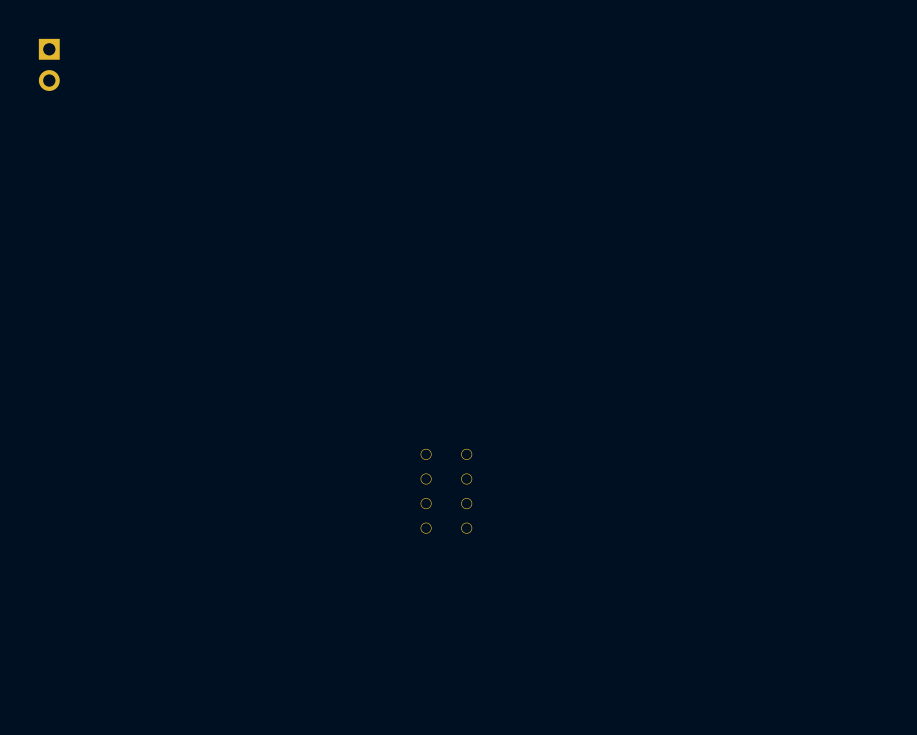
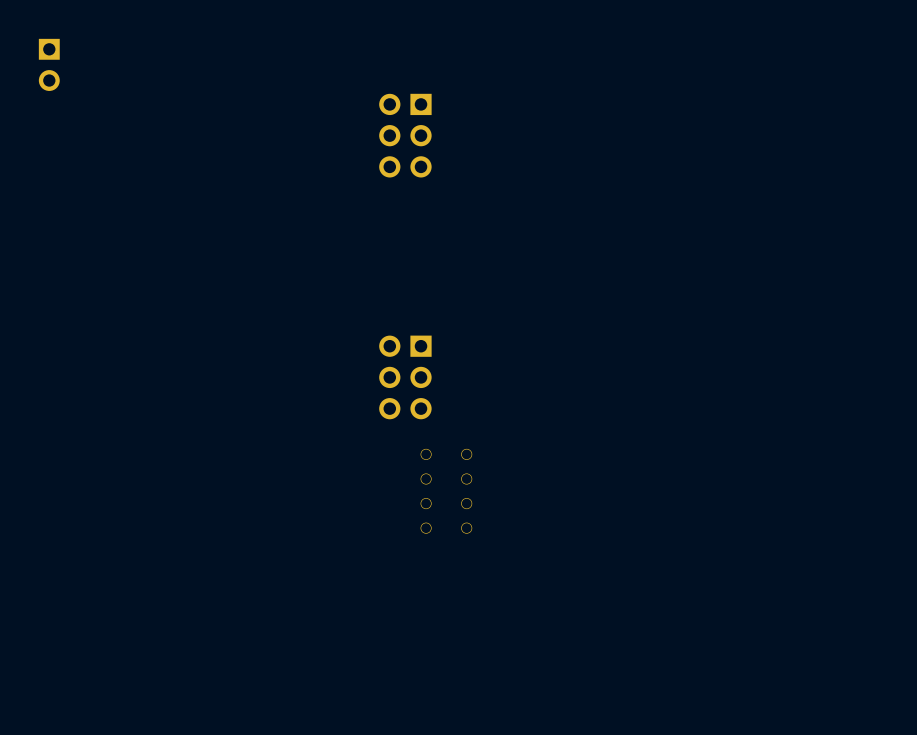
part: none -> (405, 135)
part: none -> (405, 377)

